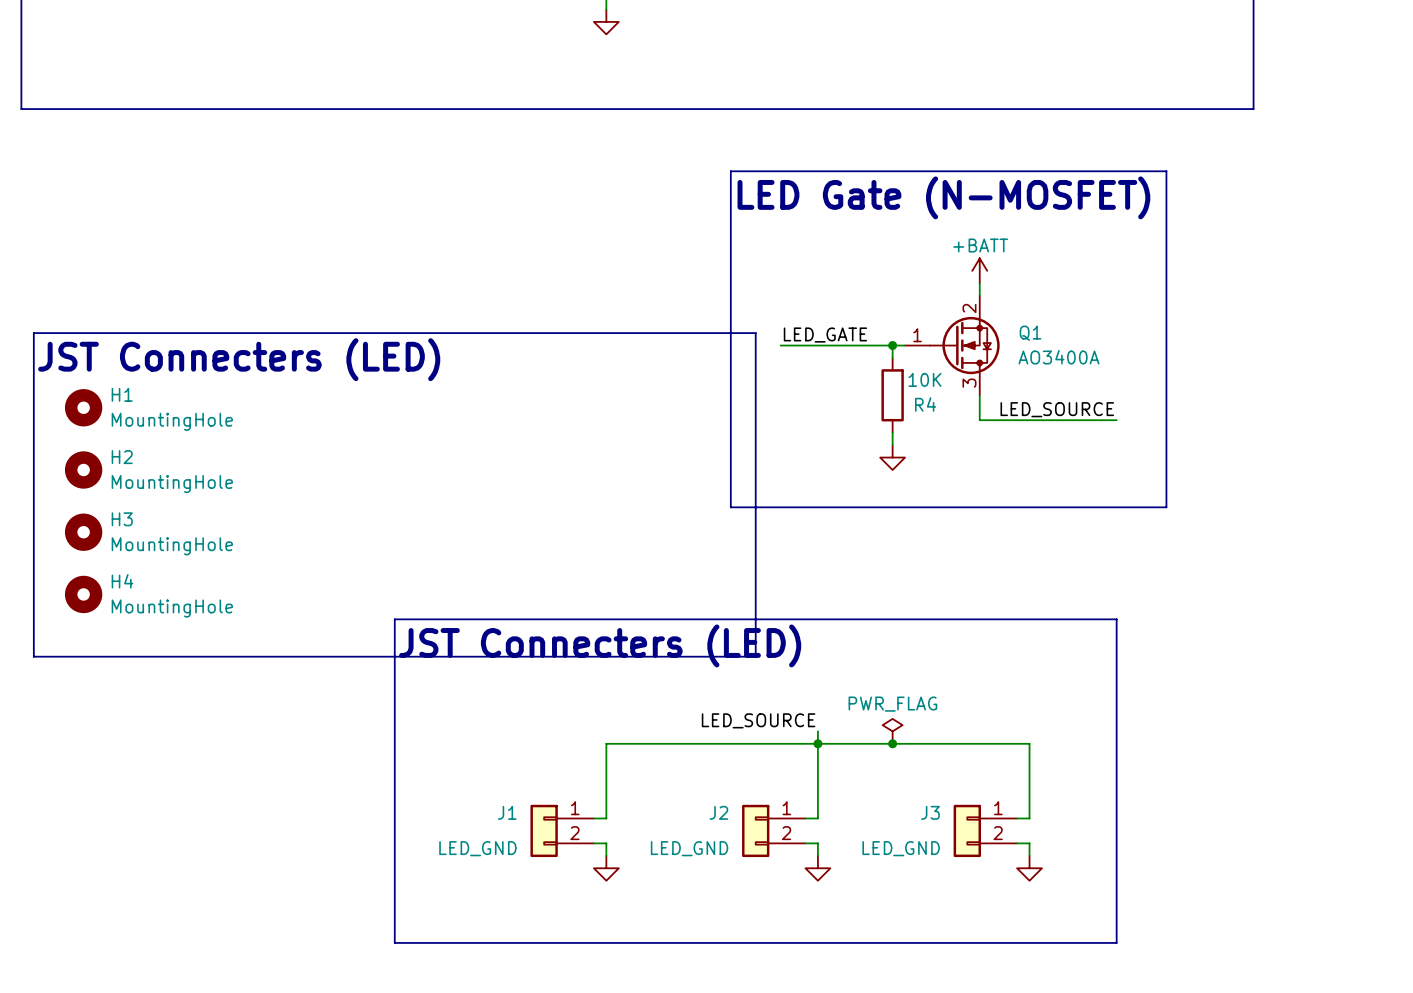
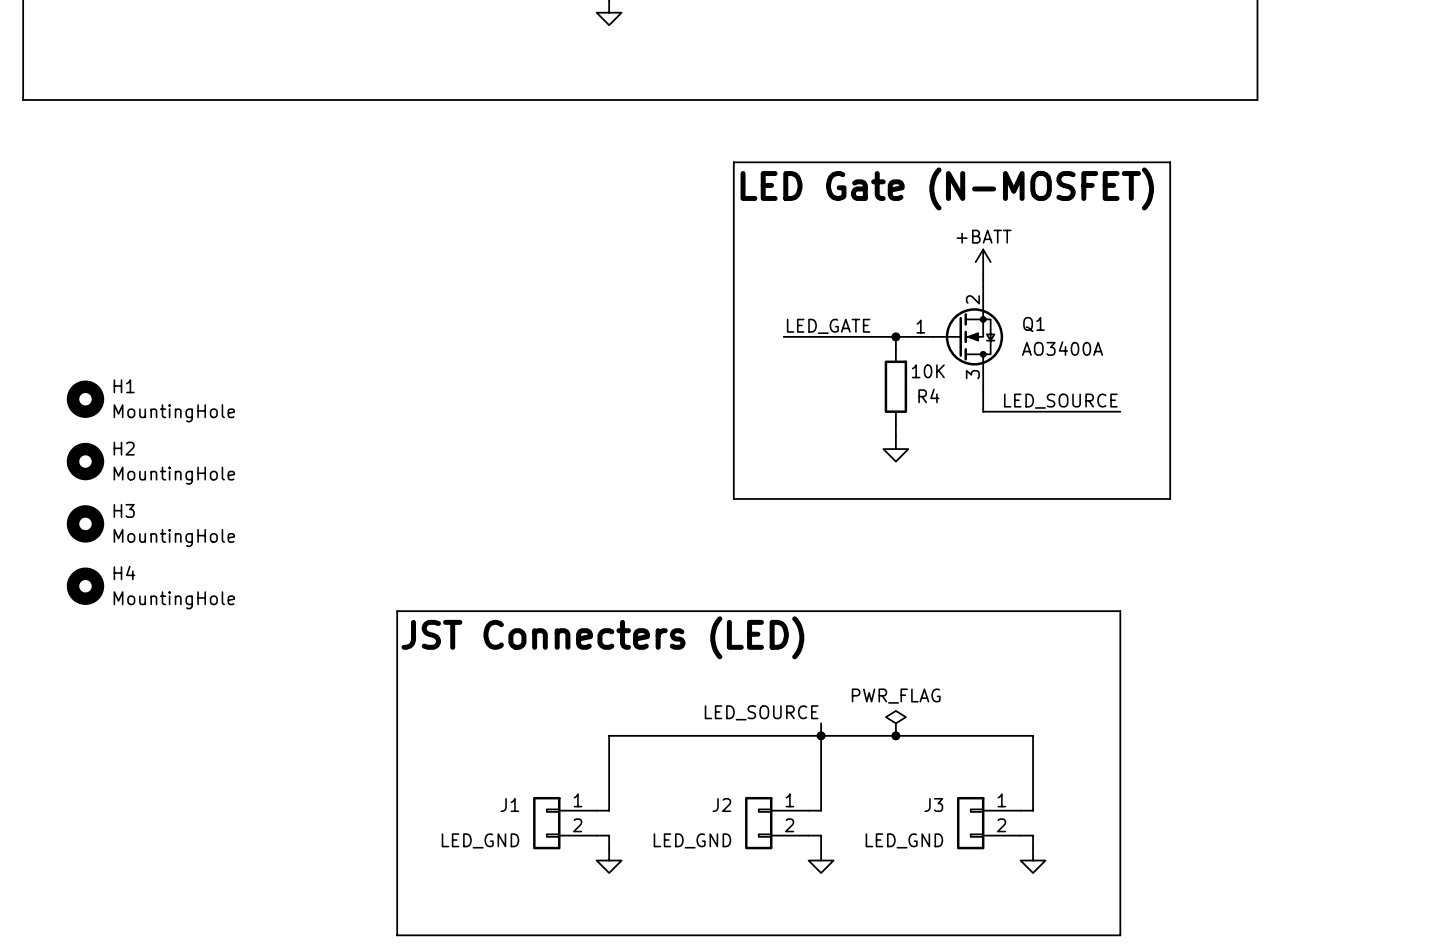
line: (33, 333) (755, 333) (755, 656) (33, 656) (33, 333) -> none
text: JST Connecters (LED) (239, 359) -> none

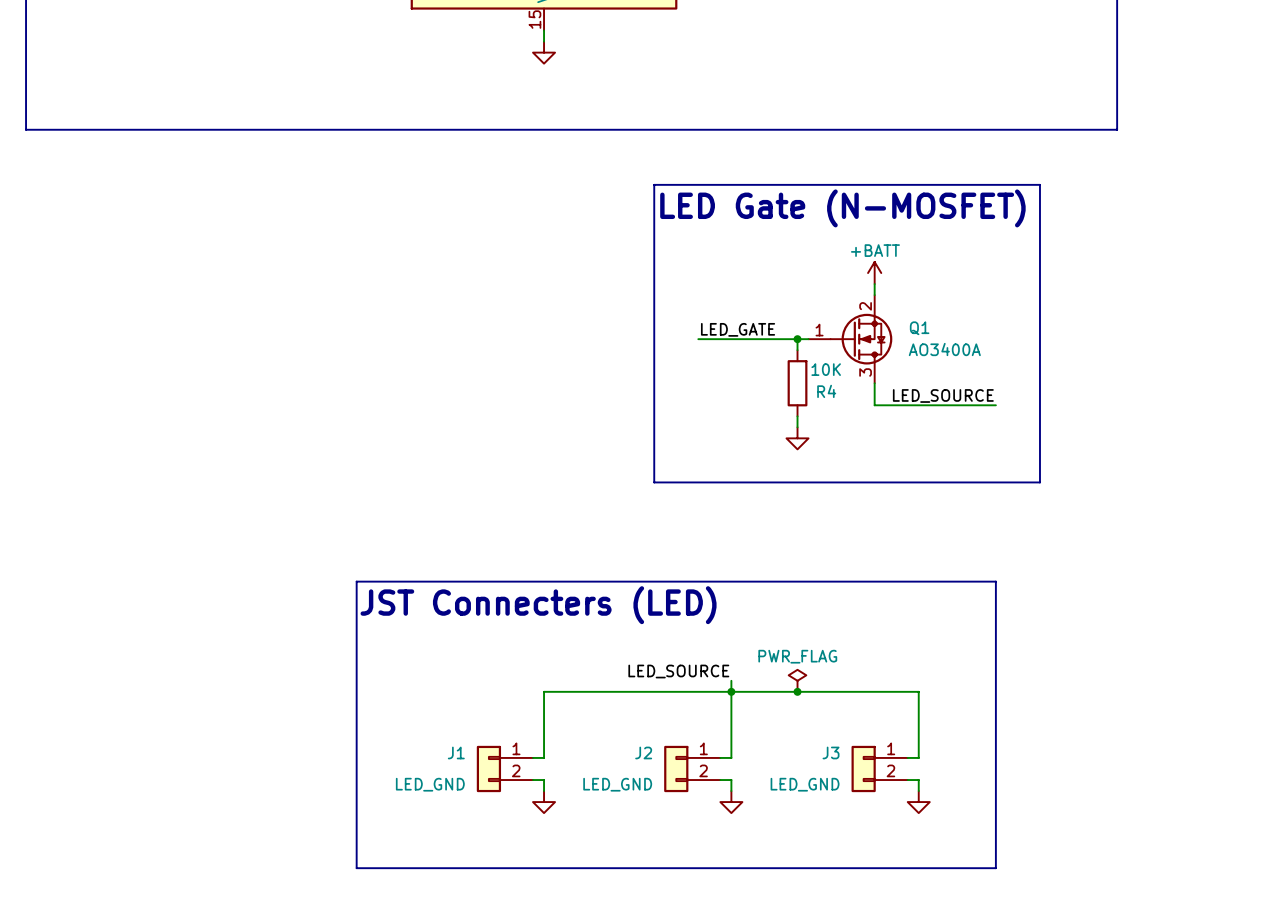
H1: MountingHole (85, 399) -> none
H2: MountingHole (85, 461) -> none
H3: MountingHole (85, 523) -> none
H4: MountingHole (85, 586) -> none

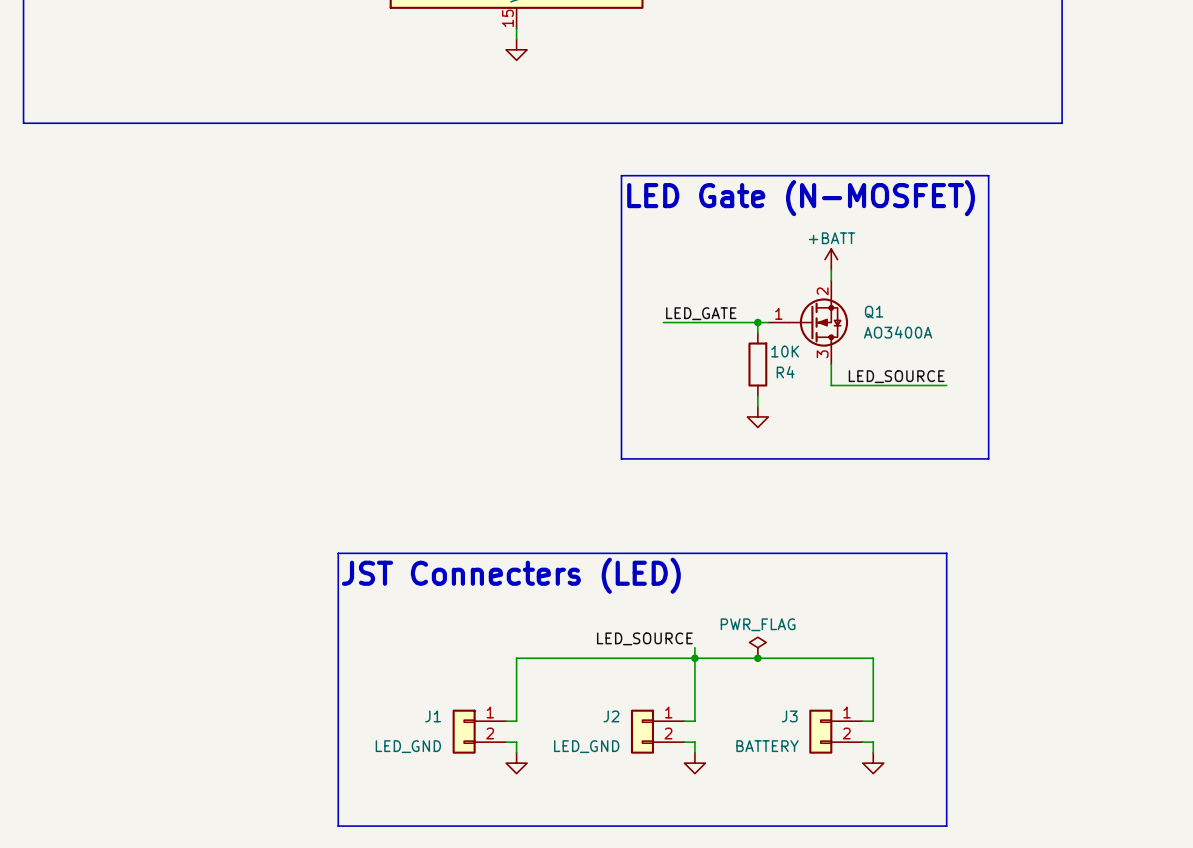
J3 value: LED_GND (805, 784) -> BATTERY (767, 746)

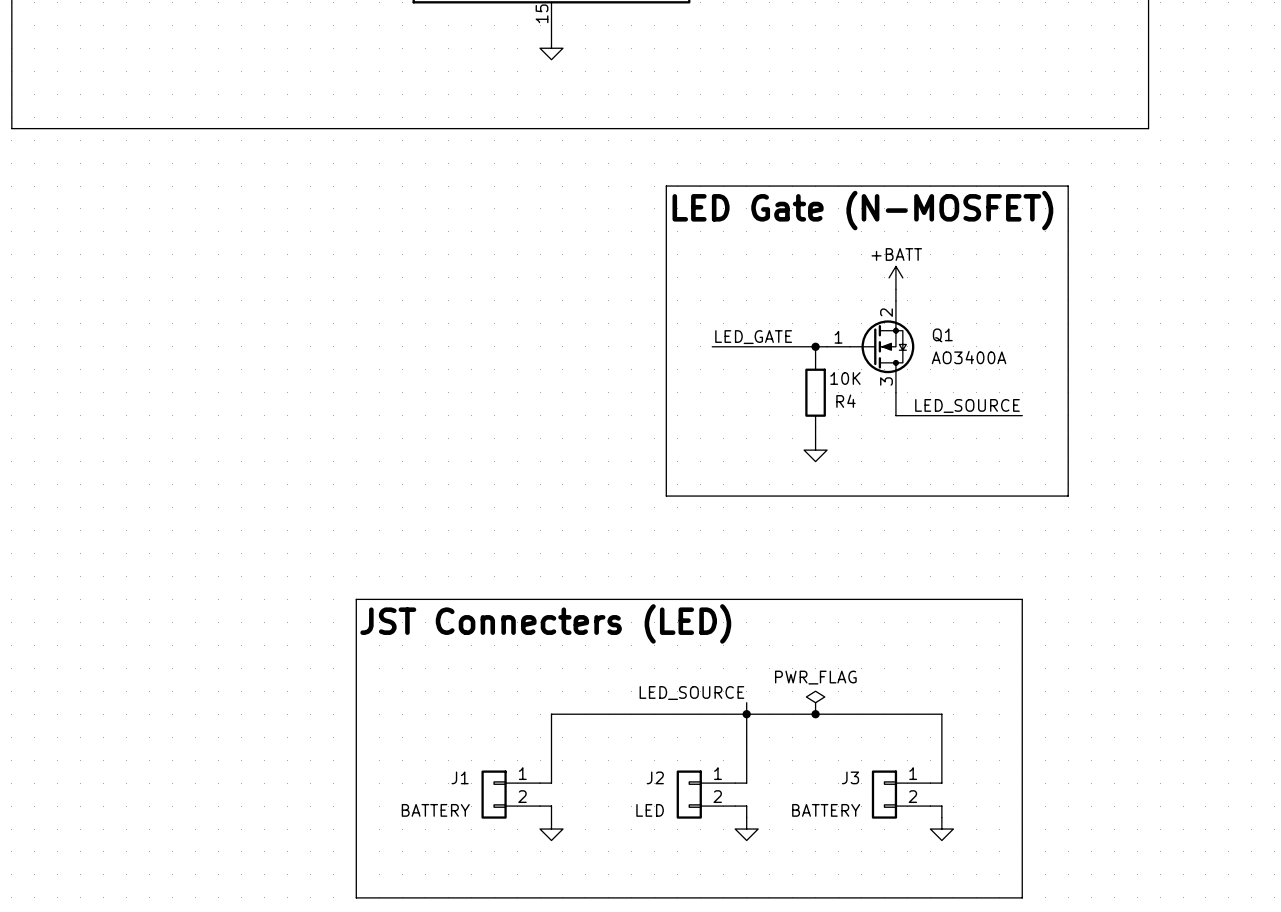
J1 value: LED_GND (408, 746) -> BATTERY (435, 810)
J2 value: LED_GND (586, 746) -> LED (650, 810)

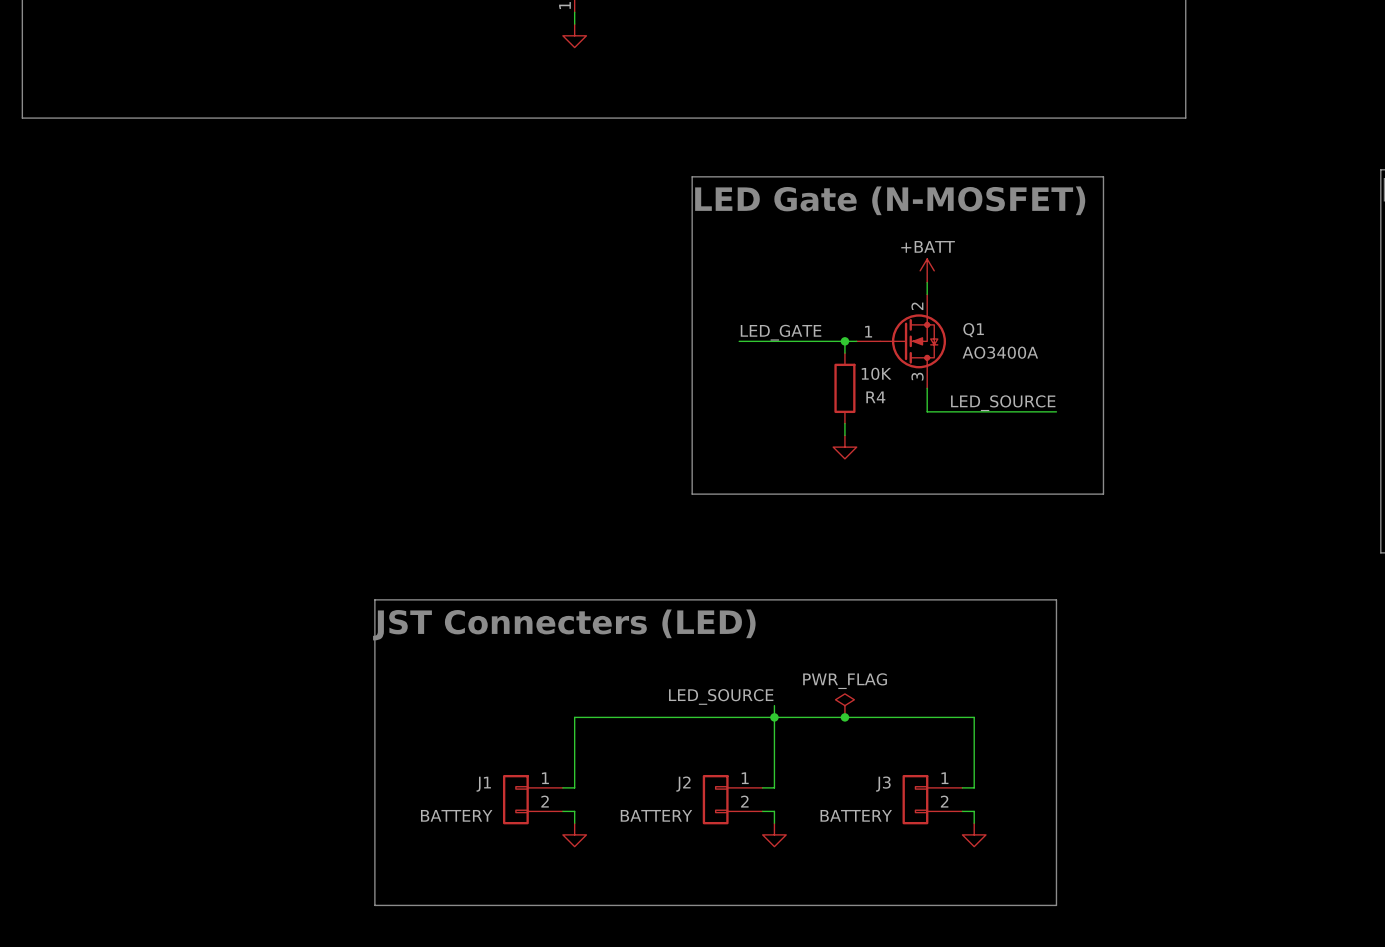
J2 value: LED (650, 810) -> BATTERY (656, 815)

